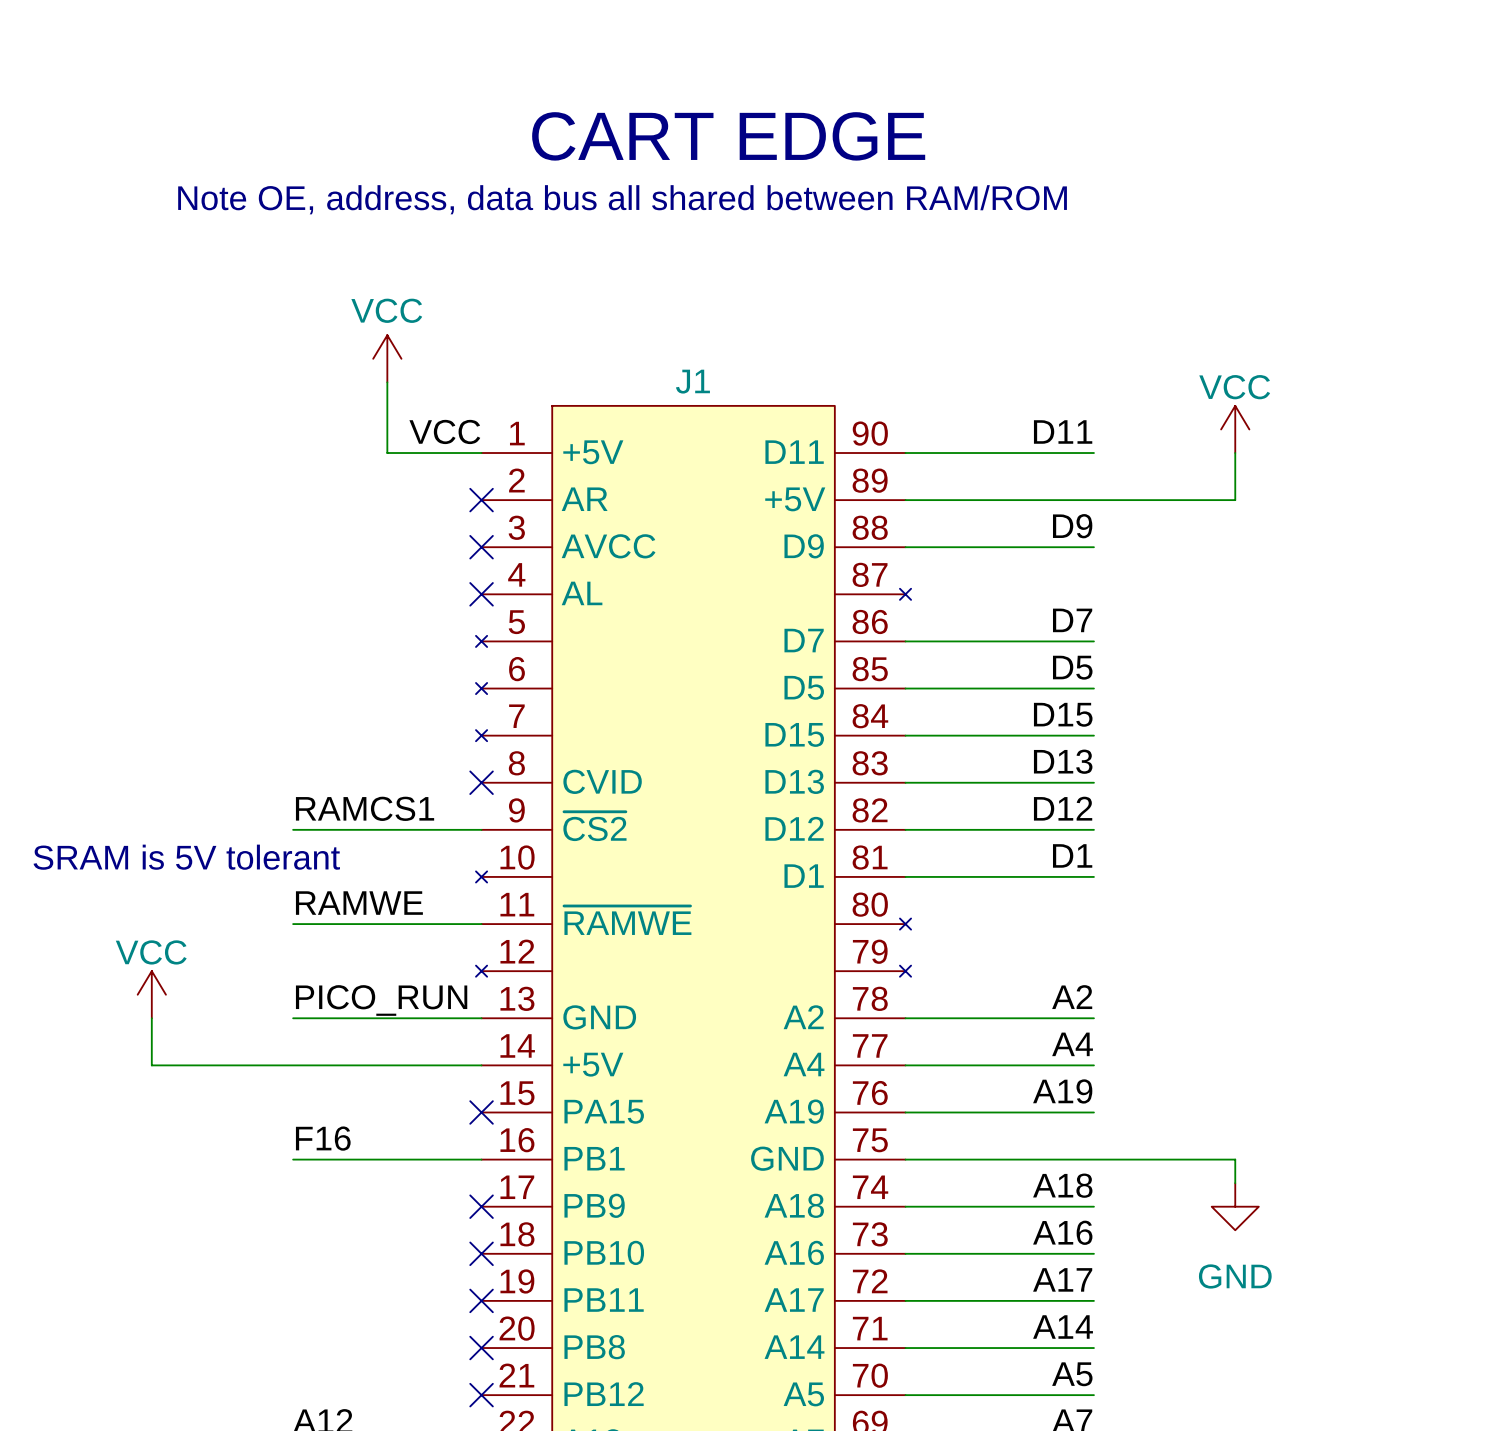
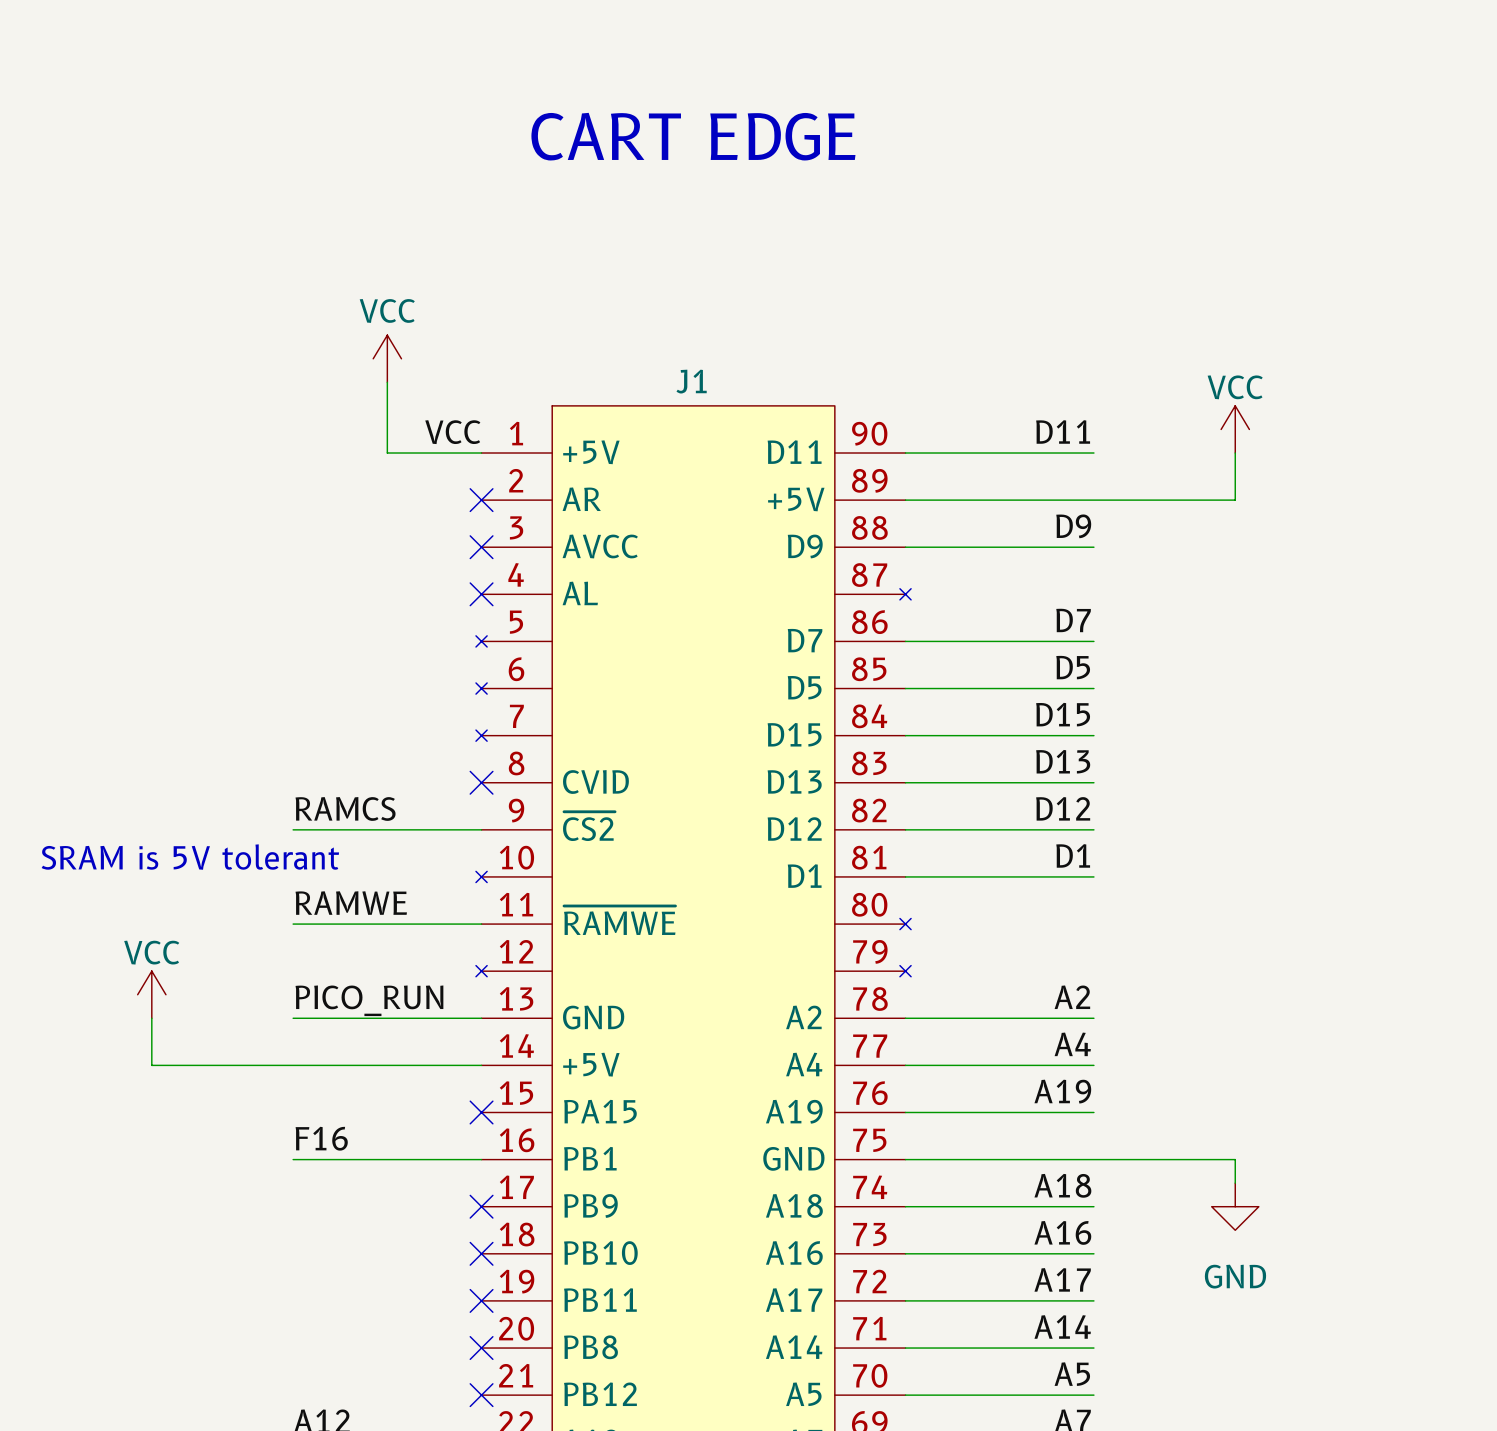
text: Note OE, address, data bus all shared between RAM/ROM (622, 199) -> none
label: RAMCS1 (365, 808) -> RAMCS (345, 808)

